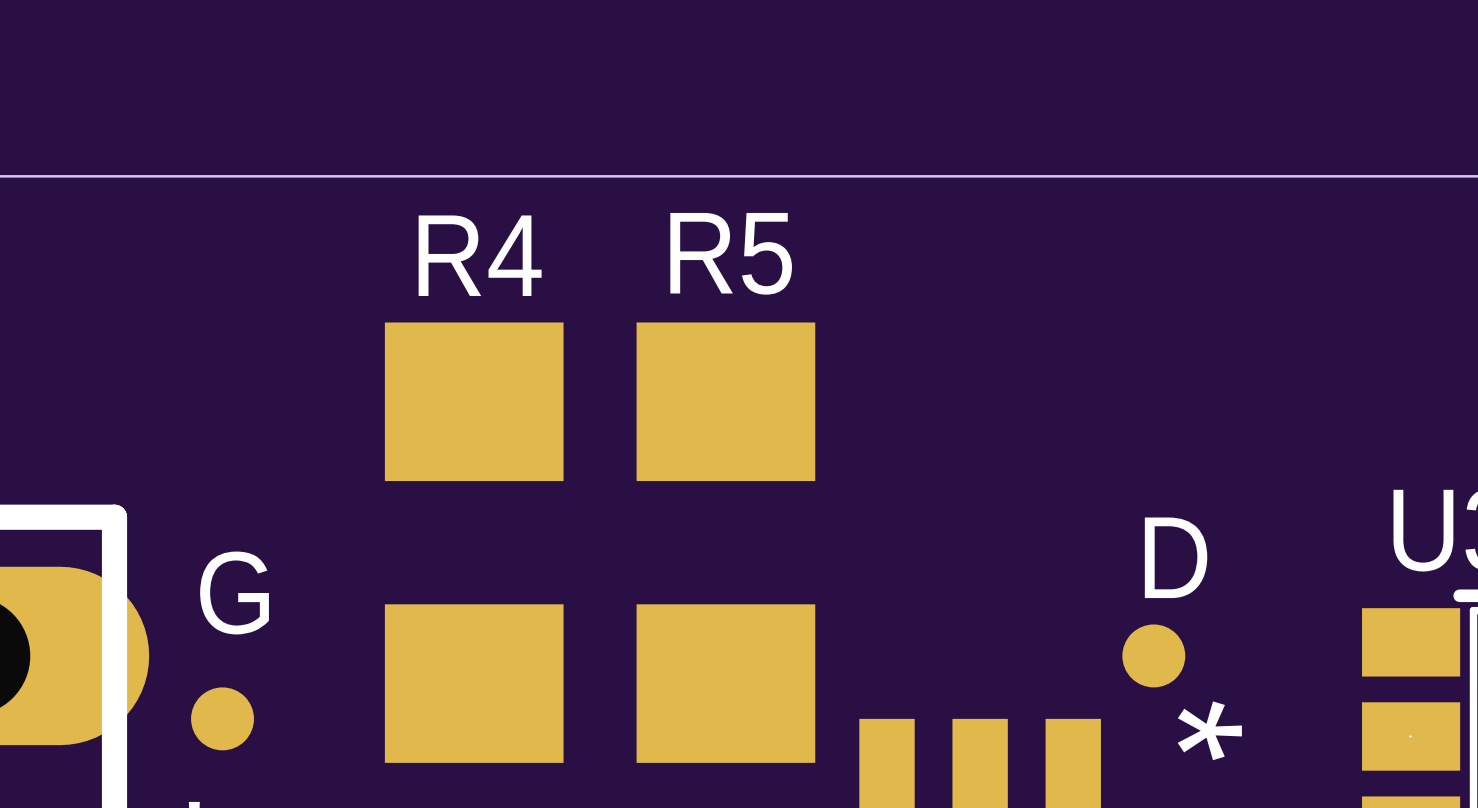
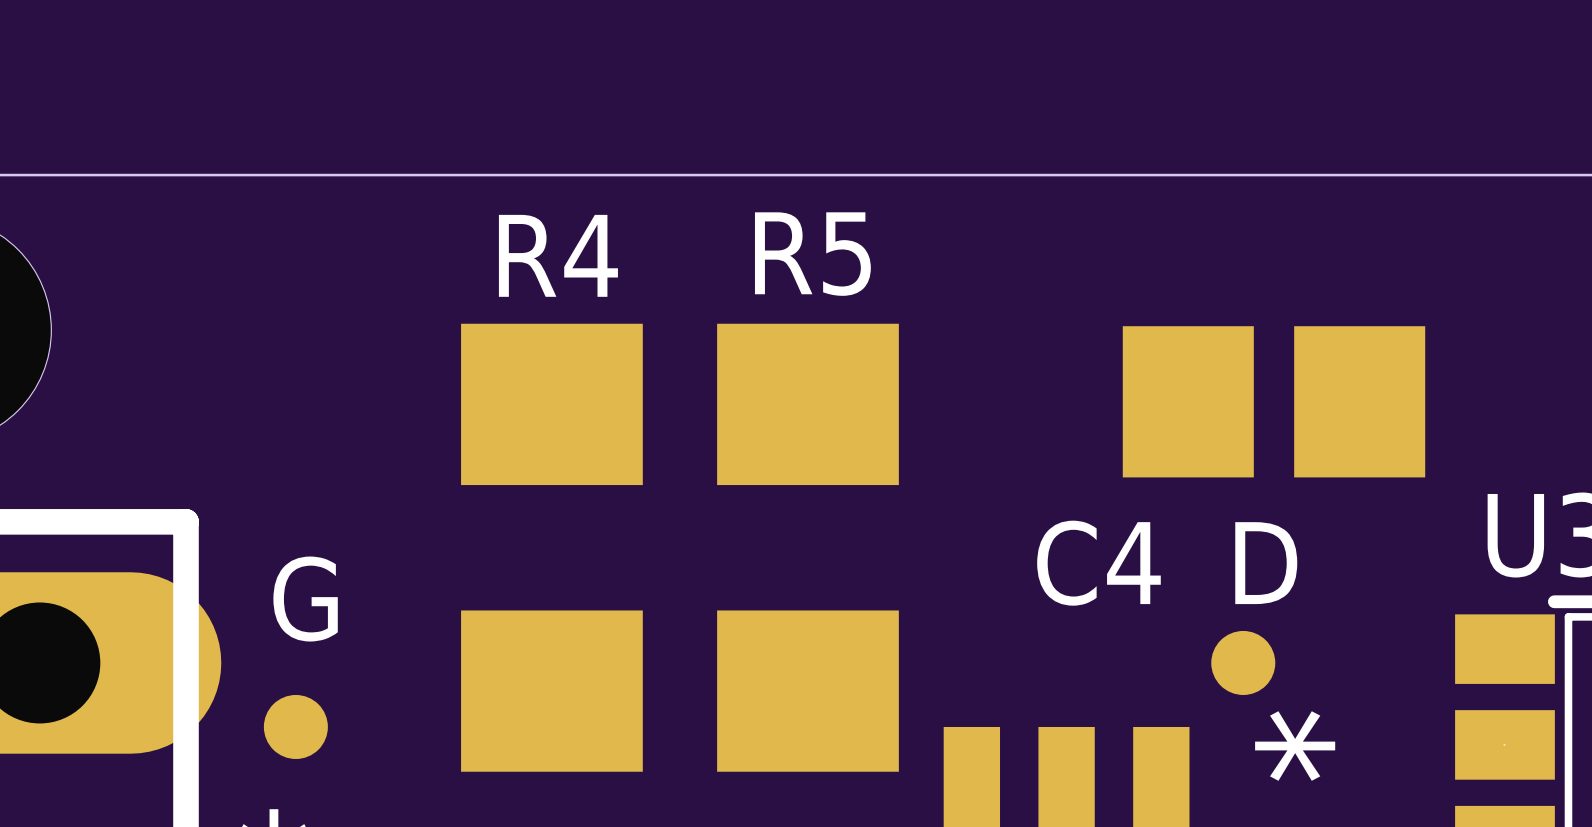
C4: none -> (1273, 401)

